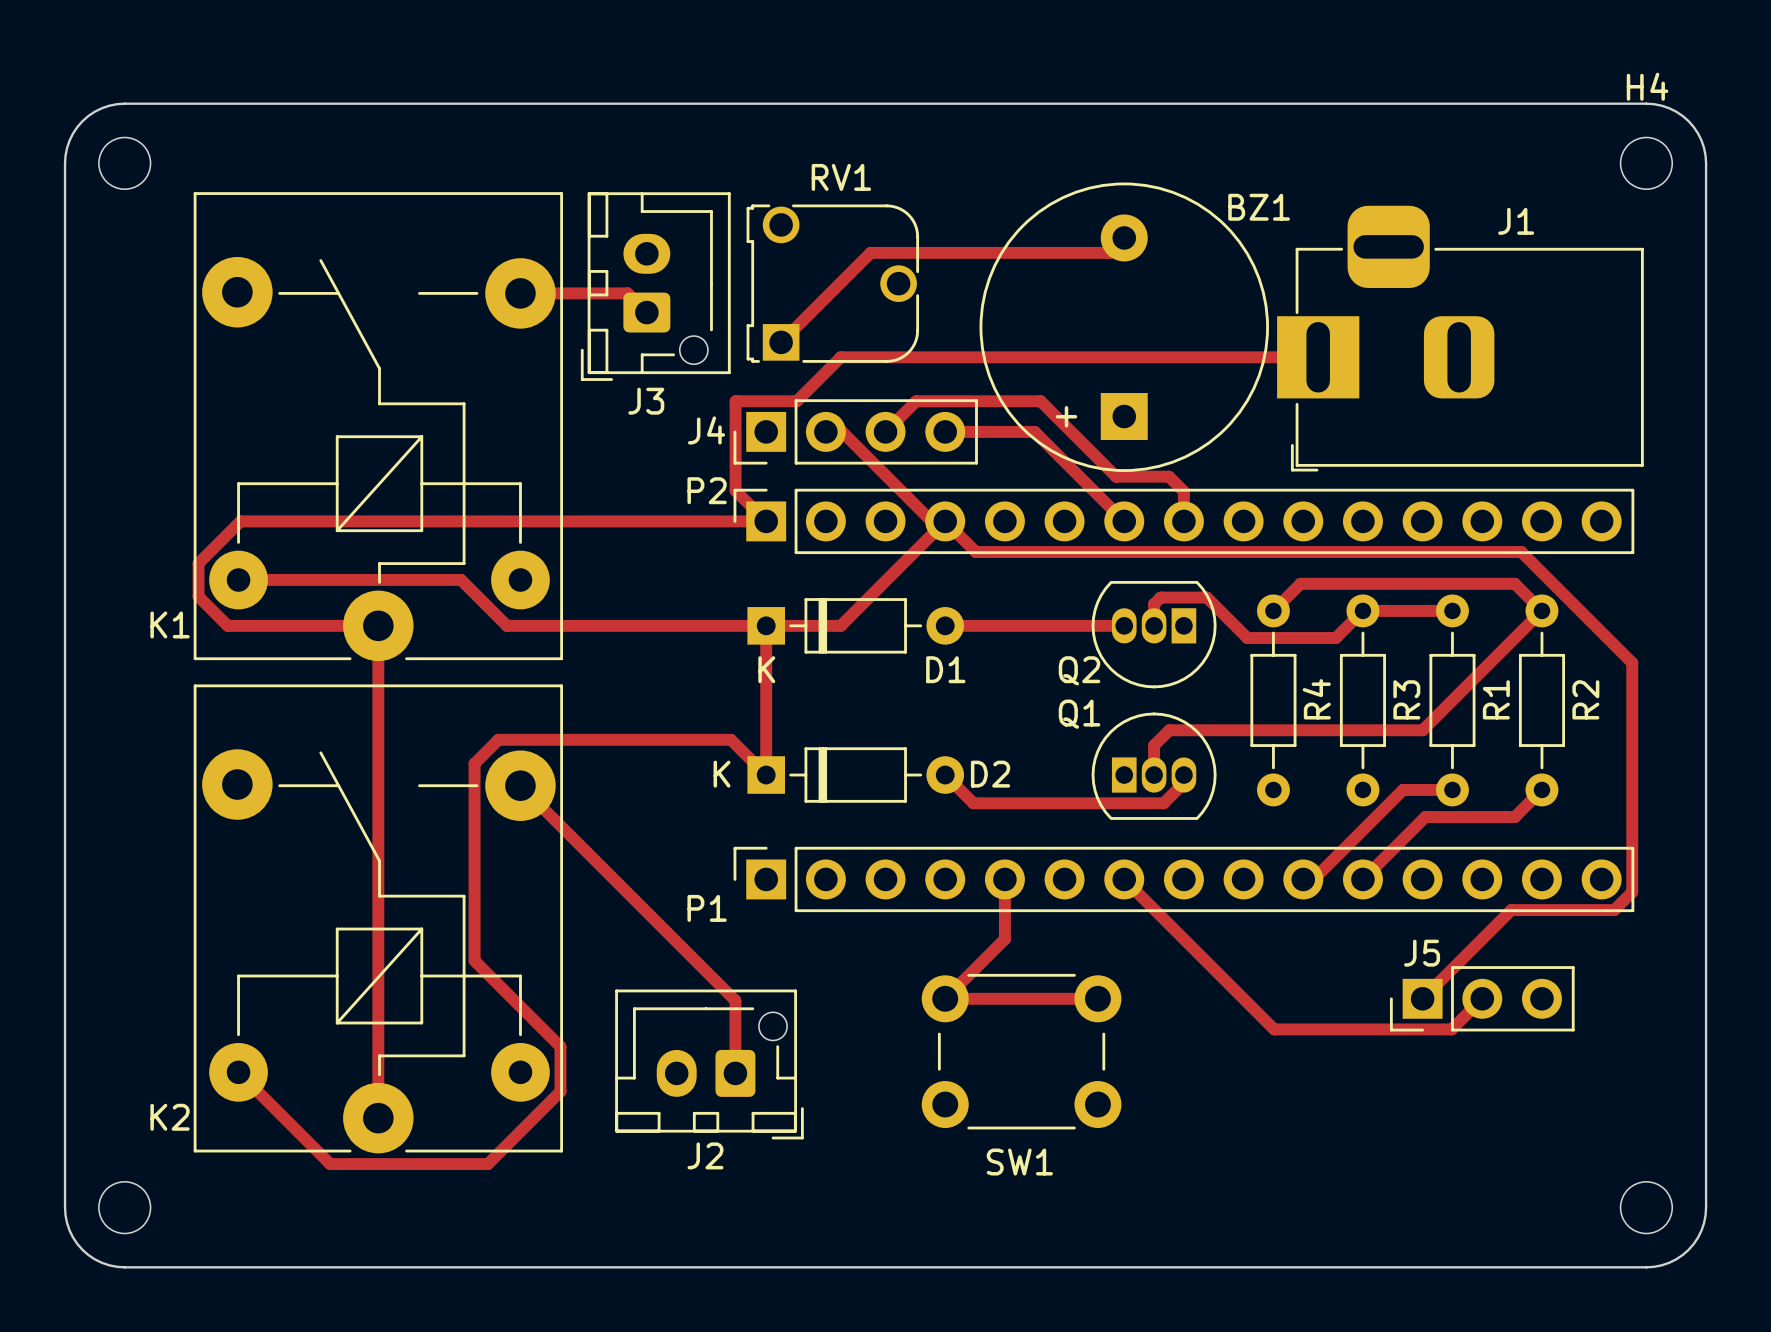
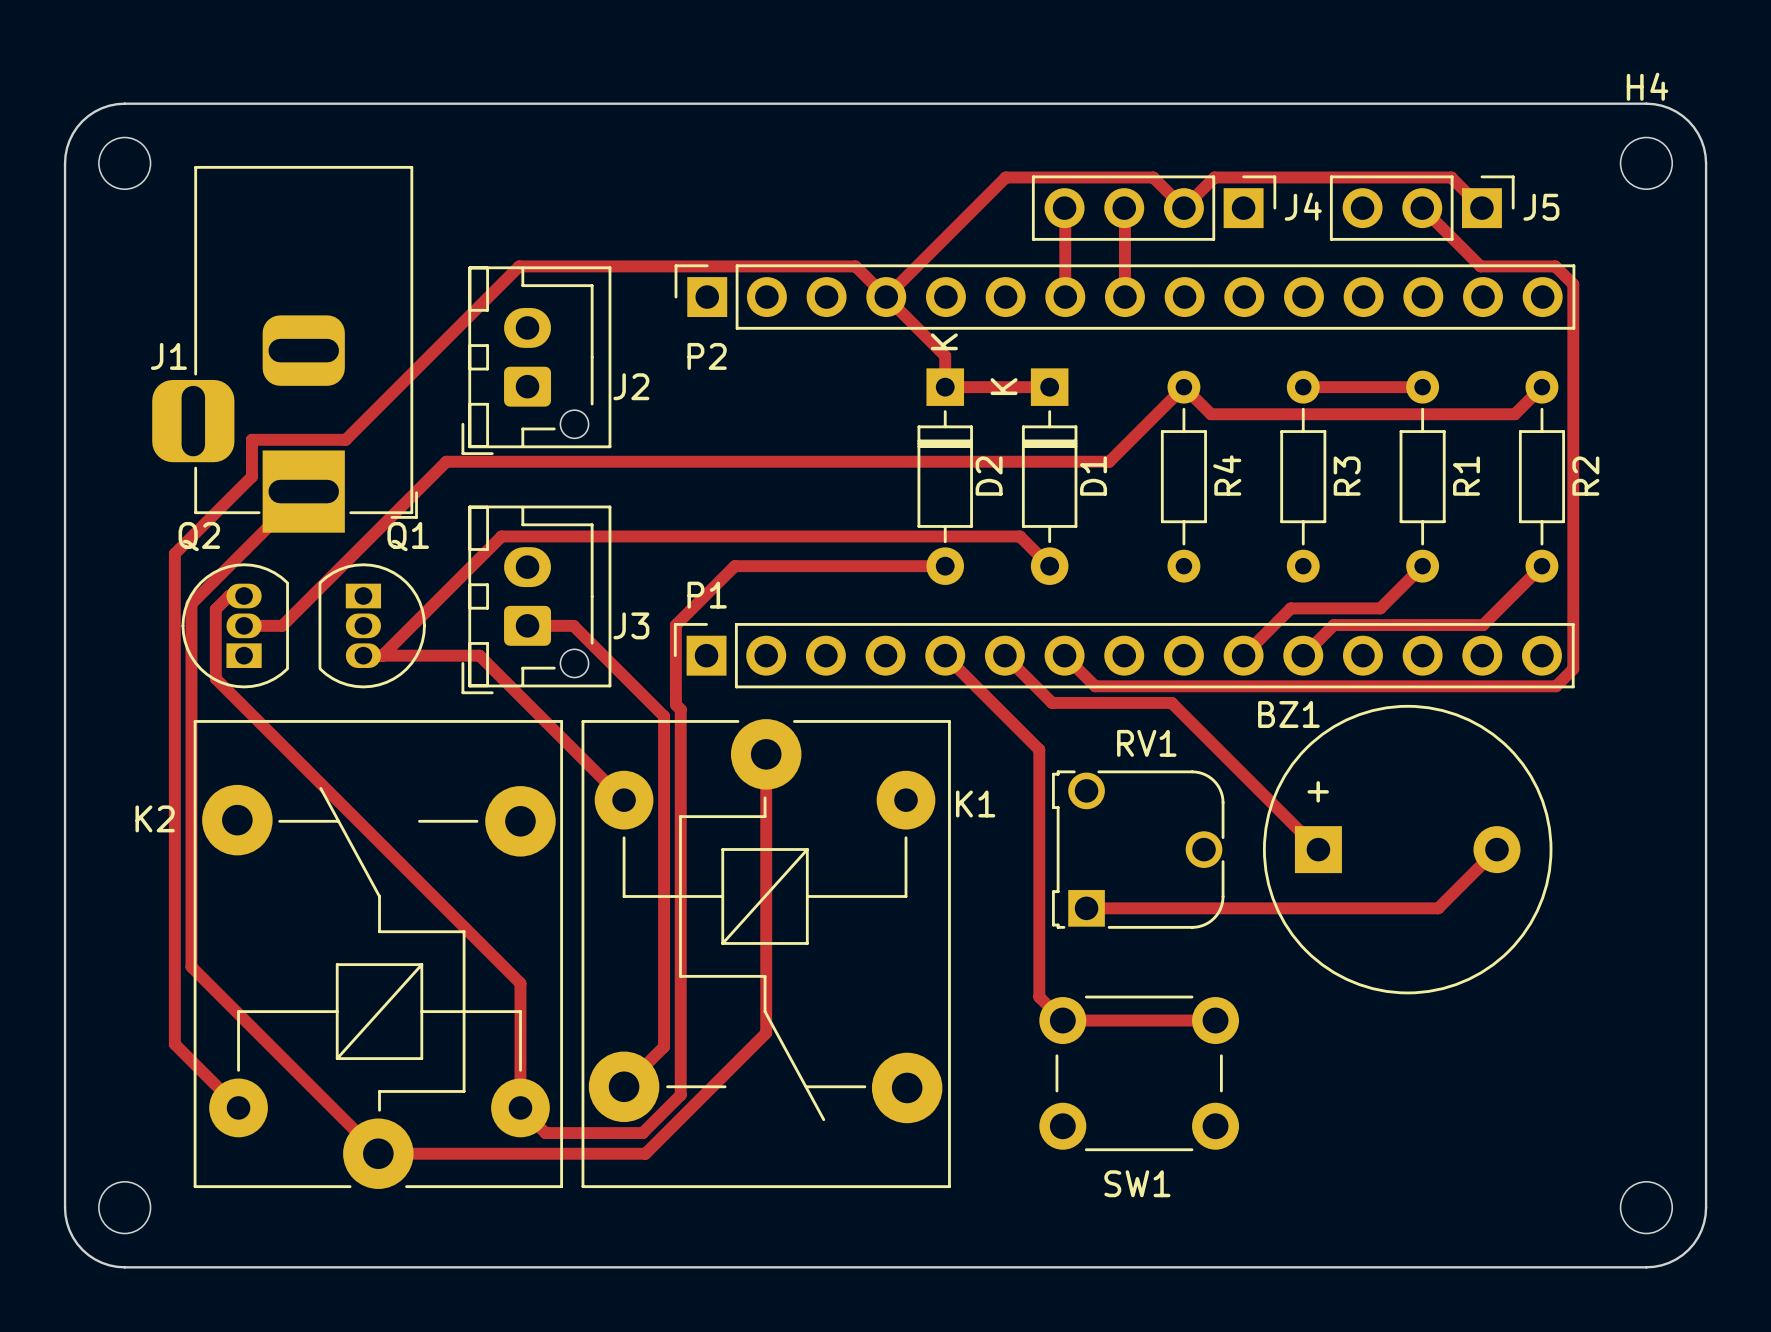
BZ1 name position: BZ1 (1259, 207) -> BZ1 (1288, 714)
track: none -> (1064, 208) (1065, 297)
track: none -> (1124, 208) (1124, 297)
track: none -> (1422, 208) (1480, 266) (1555, 266) (1573, 284) (1573, 669) (1556, 686) (1095, 686) (1064, 655)
track: none -> (1481, 208) (1451, 177) (1214, 177) (1183, 208) (1153, 177) (1005, 177) (886, 297)
J1 name position: J1 (1516, 221) -> J1 (168, 356)
track: (1124, 237) (1109, 252) (870, 252) (781, 342) -> none
RV1 position: (832, 283) -> (1138, 849)
J3 position: (655, 286) -> (536, 599)
track: (520, 293) (627, 293) (646, 312) -> none
BZ1 rotation: 0° (1124, 327) -> 90° clockwise (1407, 849)
BZ1 position: (1124, 327) -> (1407, 849)
J1 rotation: 0° (1460, 338) -> 90° counterclockwise (285, 349)
J1 position: (1460, 338) -> (285, 349)
track: (1318, 357) (840, 357) (796, 401) (735, 401) (735, 490) (766, 521) (240, 521) (198, 563) (198, 596) (227, 625) (244, 625) -> none
track: none -> (1049, 387) (945, 387) (945, 356) (855, 266) (519, 266) (345, 439) (251, 439) (251, 476) (174, 553) (174, 1044) (238, 1107)
track: none -> (1303, 387) (1422, 387)
J3 name position: J3 (646, 401) -> J3 (631, 625)
K1 rotation: 0° (378, 426) -> 180° (766, 953)
K1 position: (378, 426) -> (766, 953)
track: (825, 431) (842, 431) (931, 521) (945, 521) -> none
J4 rotation: 0° (855, 431) -> 180° (1154, 208)
J4 position: (855, 431) -> (1154, 208)
track: (885, 431) (916, 401) (1040, 401) (1116, 476) (1169, 476) (1183, 491) (1183, 521) -> none
track: (945, 431) (1034, 431) (1124, 521) -> none
P2 name position: P2 (707, 490) -> P2 (707, 356)
track: (945, 521) (840, 625) (573, 625) -> (624, 1086) (664, 1046) (664, 716) (573, 625)
track: (945, 521) (975, 552) (1521, 552) (1632, 662) (1632, 892) (1614, 910) (1511, 910) (1422, 998) -> none
P2 position: (1183, 521) -> (1124, 297)
track: none -> (945, 566) (734, 566) (675, 625) (675, 704) (680, 709) (680, 1095) (642, 1133) (545, 1133) (520, 1107) (520, 983) (215, 678) (215, 609) (229, 596) (244, 596)
track: none -> (1049, 566) (1019, 536) (501, 536) (382, 655)
track: none -> (1422, 566) (1380, 608) (1290, 608) (1243, 655)
track: none -> (1541, 566) (1483, 625) (1333, 625) (1303, 655)
track: (238, 579) (461, 579) (507, 625) (527, 625) -> none
track: (1273, 610) (1300, 583) (1514, 583) (1541, 610) (1422, 730) (1169, 730) (1154, 745) (1154, 775) -> none
track: (1452, 610) (1362, 610) (1335, 638) (1247, 638) (1206, 597) (1160, 597) (1154, 604) (1154, 625) -> none
K1 name position: K1 (170, 624) -> K1 (975, 803)
track: (282, 625) (378, 625) (378, 1118) -> (282, 625) (446, 461) (1109, 461) (1183, 387) (1211, 414) (1514, 414) (1541, 387)
track: (766, 625) (766, 754) -> none
D1 rotation: 0° (855, 625) -> 90° clockwise (1049, 476)
D1 position: (855, 625) -> (1049, 476)
track: (945, 625) (1124, 625) -> none
Q1 rotation: 0° (1154, 634) -> 90° counterclockwise (372, 625)
Q1 position: (1154, 634) -> (372, 625)
track: none -> (363, 655) (479, 655) (624, 800)
track: none -> (945, 655) (1039, 749) (1039, 997) (1062, 1020) (1215, 1020)
track: none -> (1004, 655) (1052, 702) (1171, 702) (1318, 849)
D1 name position: D1 (945, 669) -> D1 (1093, 476)
R4 position: (1273, 700) -> (1183, 476)
R3 position: (1362, 700) -> (1303, 476)
R1 position: (1452, 700) -> (1422, 476)
R2 position: (1541, 700) -> (1541, 476)
Q1 name position: Q1 (1079, 714) -> Q1 (408, 536)
Q2 rotation: 0° (1154, 766) -> 90° counterclockwise (235, 625)
Q2 position: (1154, 766) -> (235, 625)
D2 name position: D2 (990, 774) -> D2 (989, 476)
track: (766, 775) (730, 739) (498, 739) (474, 763) (474, 960) (560, 1046) (560, 1091) (488, 1164) (330, 1164) (238, 1072) -> (766, 775) (766, 1033) (645, 1153) (378, 1153) (191, 966) (191, 603) (303, 491)
D2 rotation: 0° (855, 775) -> 90° clockwise (945, 476)
D2 position: (855, 775) -> (945, 476)
track: (945, 775) (973, 803) (1163, 803) (1183, 782) (1183, 775) -> none
track: (520, 785) (735, 1000) (735, 1073) -> none
track: (1452, 789) (1403, 789) (1313, 879) (1303, 879) -> none
track: (1541, 789) (1514, 817) (1425, 817) (1362, 879) -> none
track: none -> (1496, 849) (1438, 908) (1086, 908)
track: (1004, 879) (1004, 939) (945, 998) (1097, 998) -> none
track: (1124, 879) (1274, 1029) (1451, 1029) (1482, 998) -> none
P1 position: (1183, 879) -> (1124, 655)
P1 name position: P1 (707, 908) -> P1 (707, 595)
K2 position: (378, 918) -> (378, 954)
J5 name position: J5 (1422, 953) -> J5 (1541, 207)
J5 rotation: 0° (1482, 998) -> 180° (1422, 208)
J5 position: (1482, 998) -> (1422, 208)
SW1 position: (1021, 1051) -> (1139, 1073)
J2 rotation: 0° (709, 1064) -> 90° clockwise (536, 360)
J2 position: (709, 1064) -> (536, 360)
K2 name position: K2 (170, 1117) -> K2 (155, 818)
J2 name position: J2 (705, 1155) -> J2 (631, 386)

